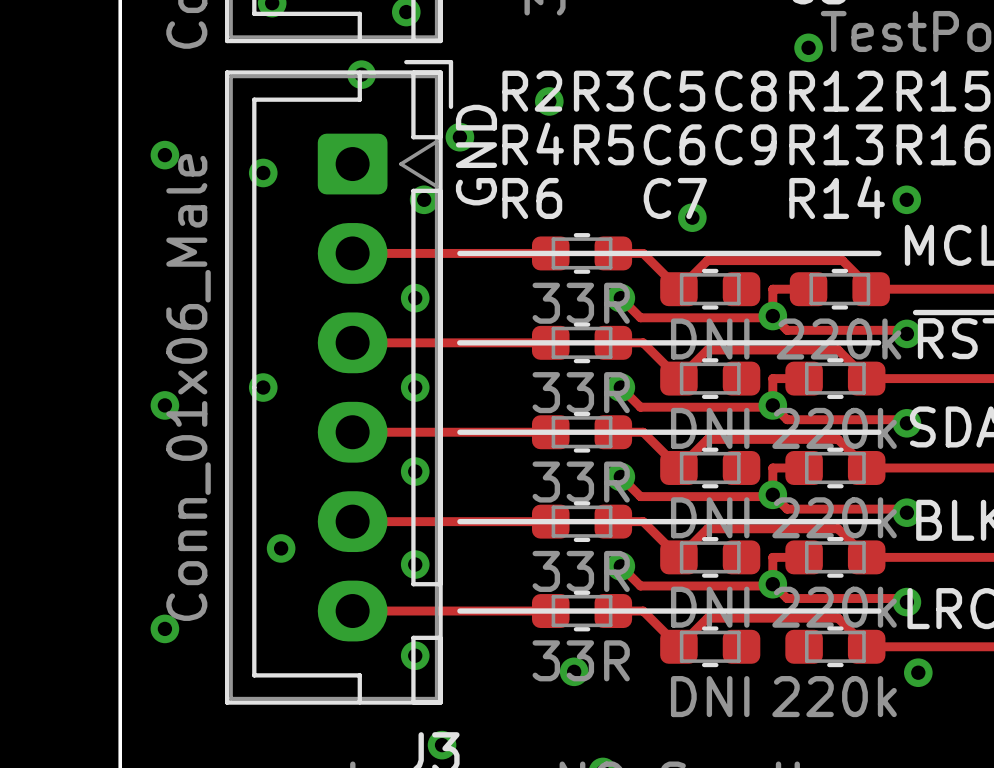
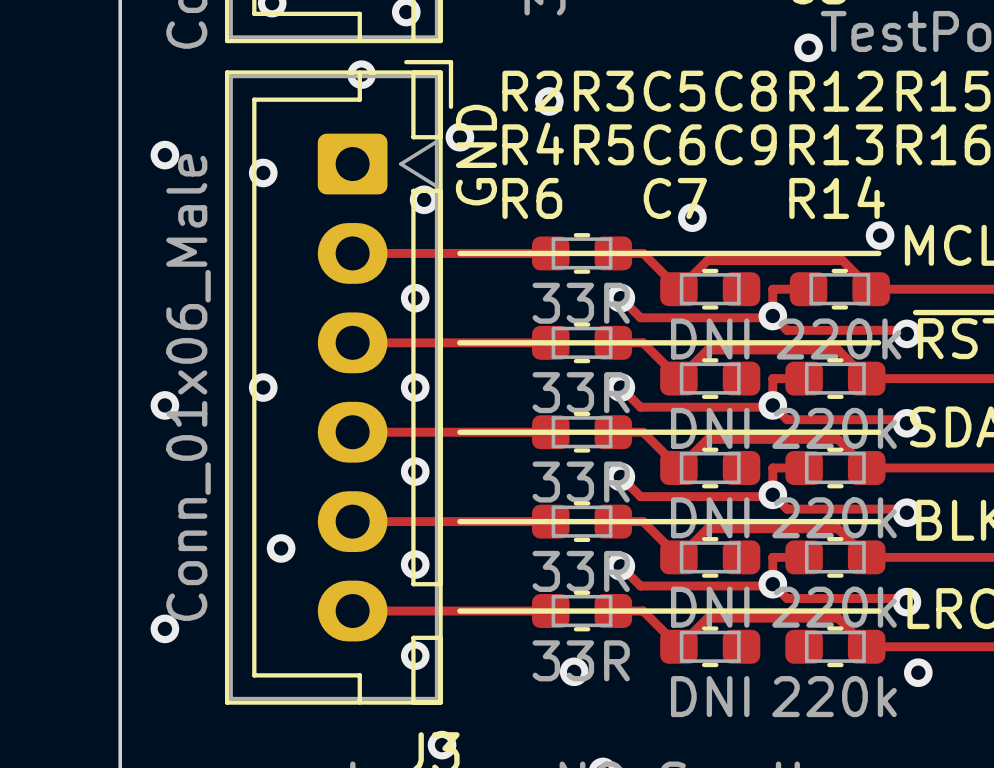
via position: (906, 199) -> (880, 235)

